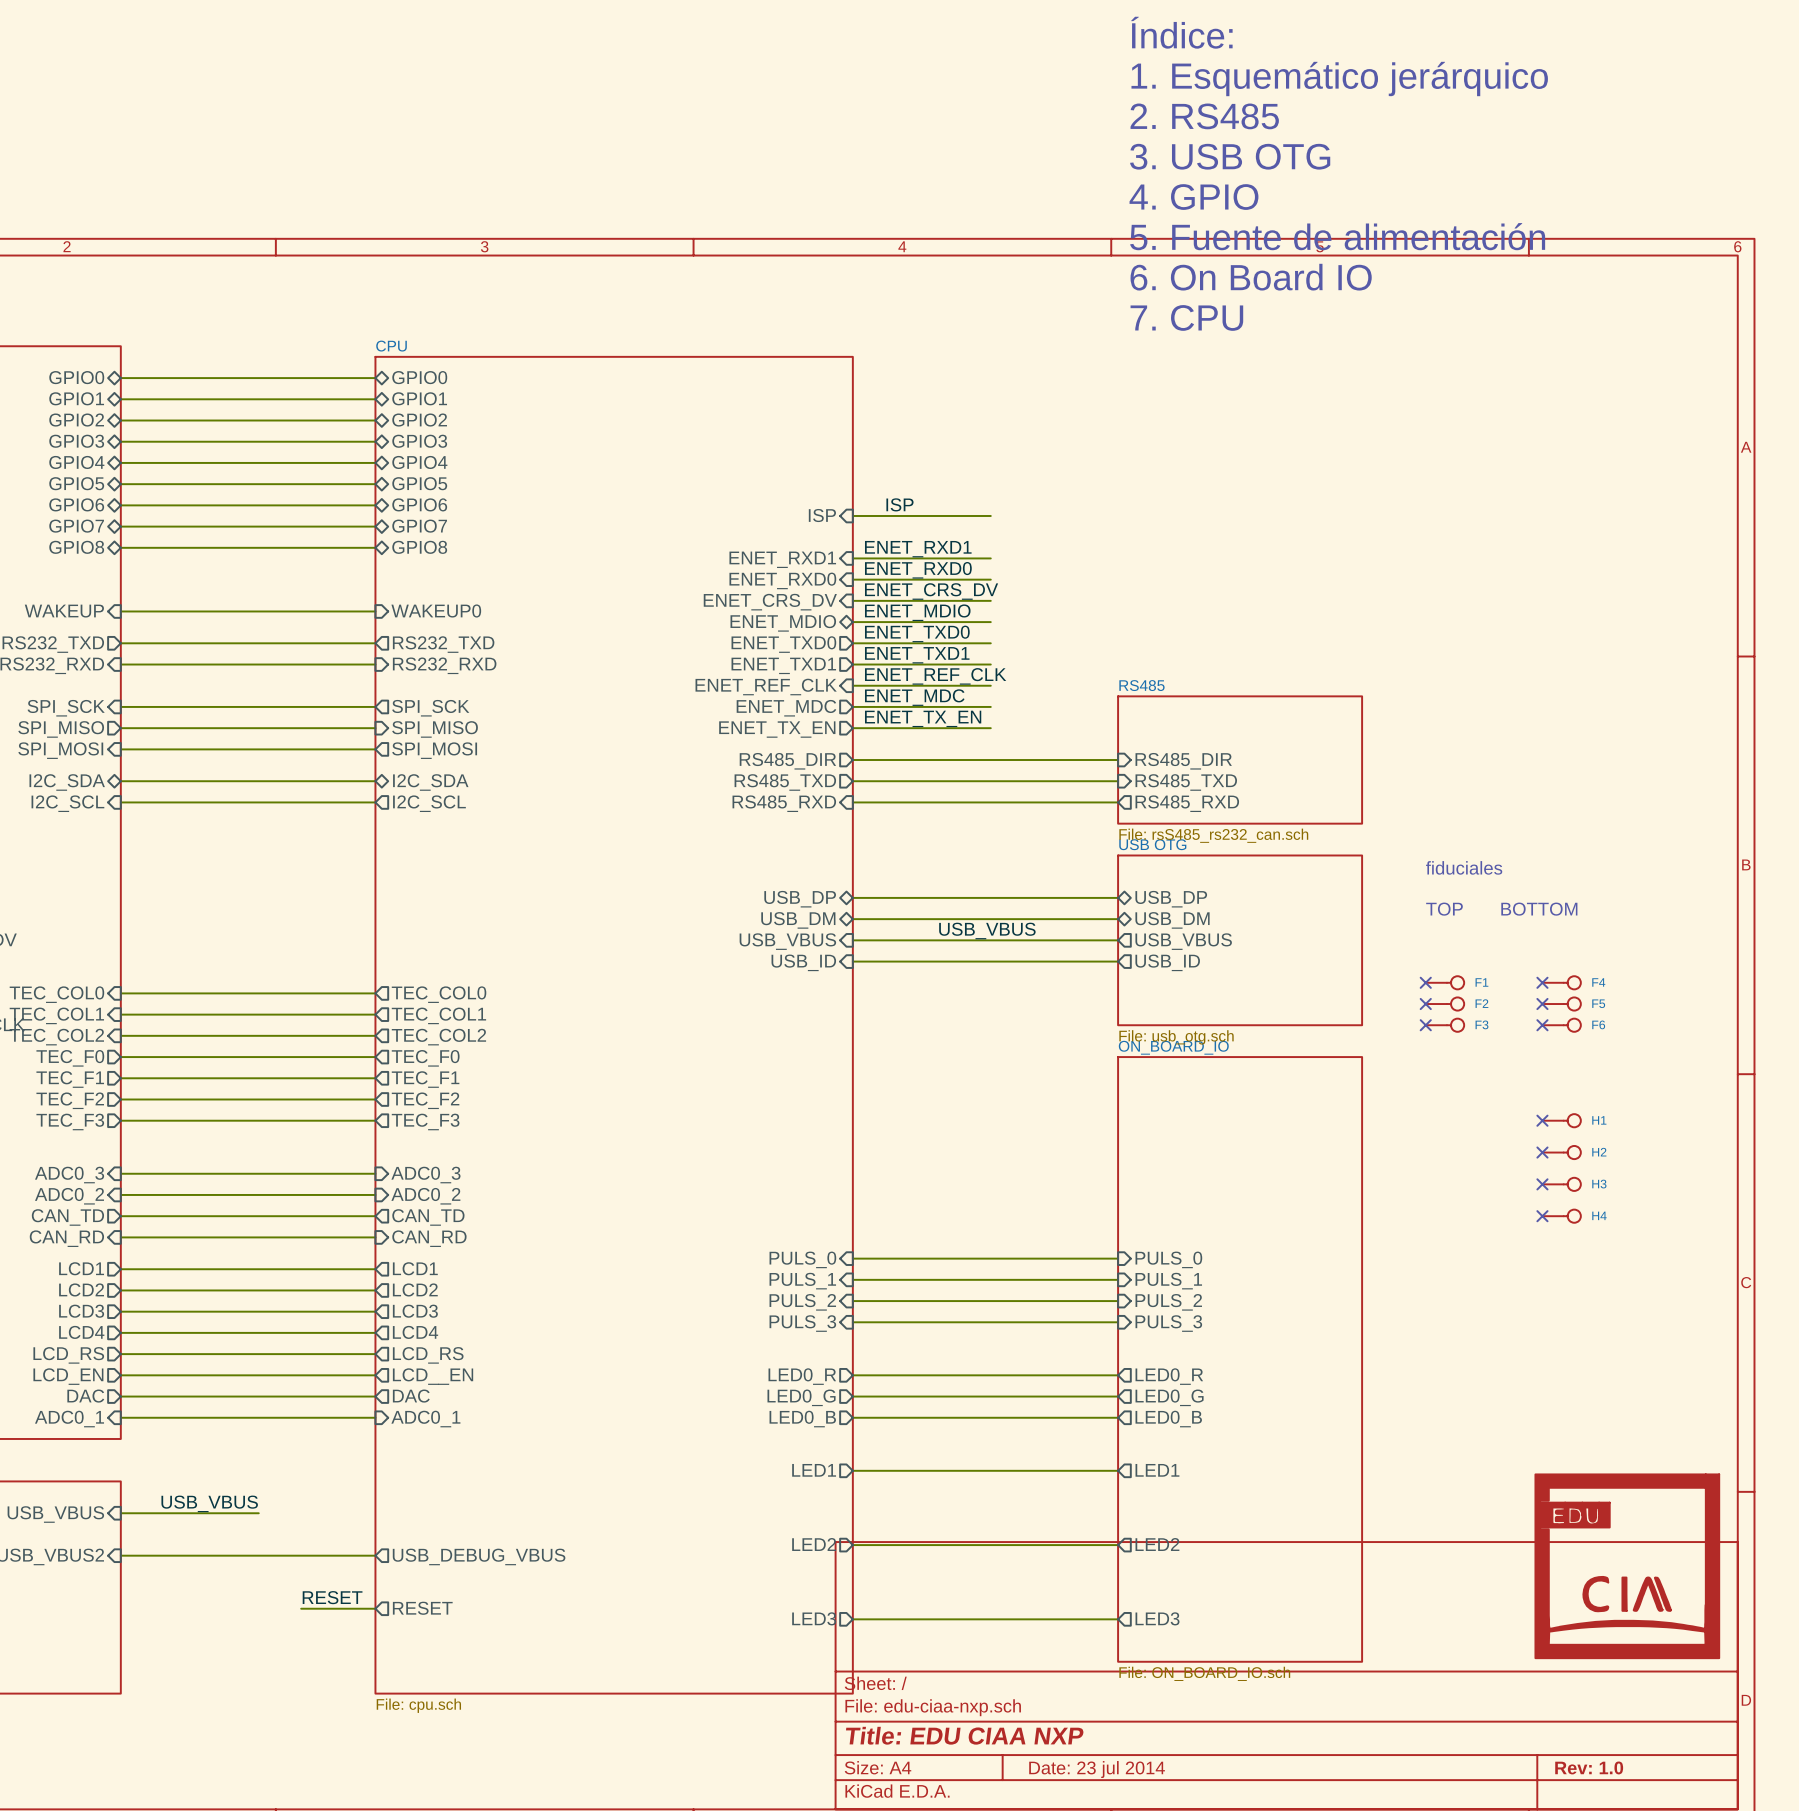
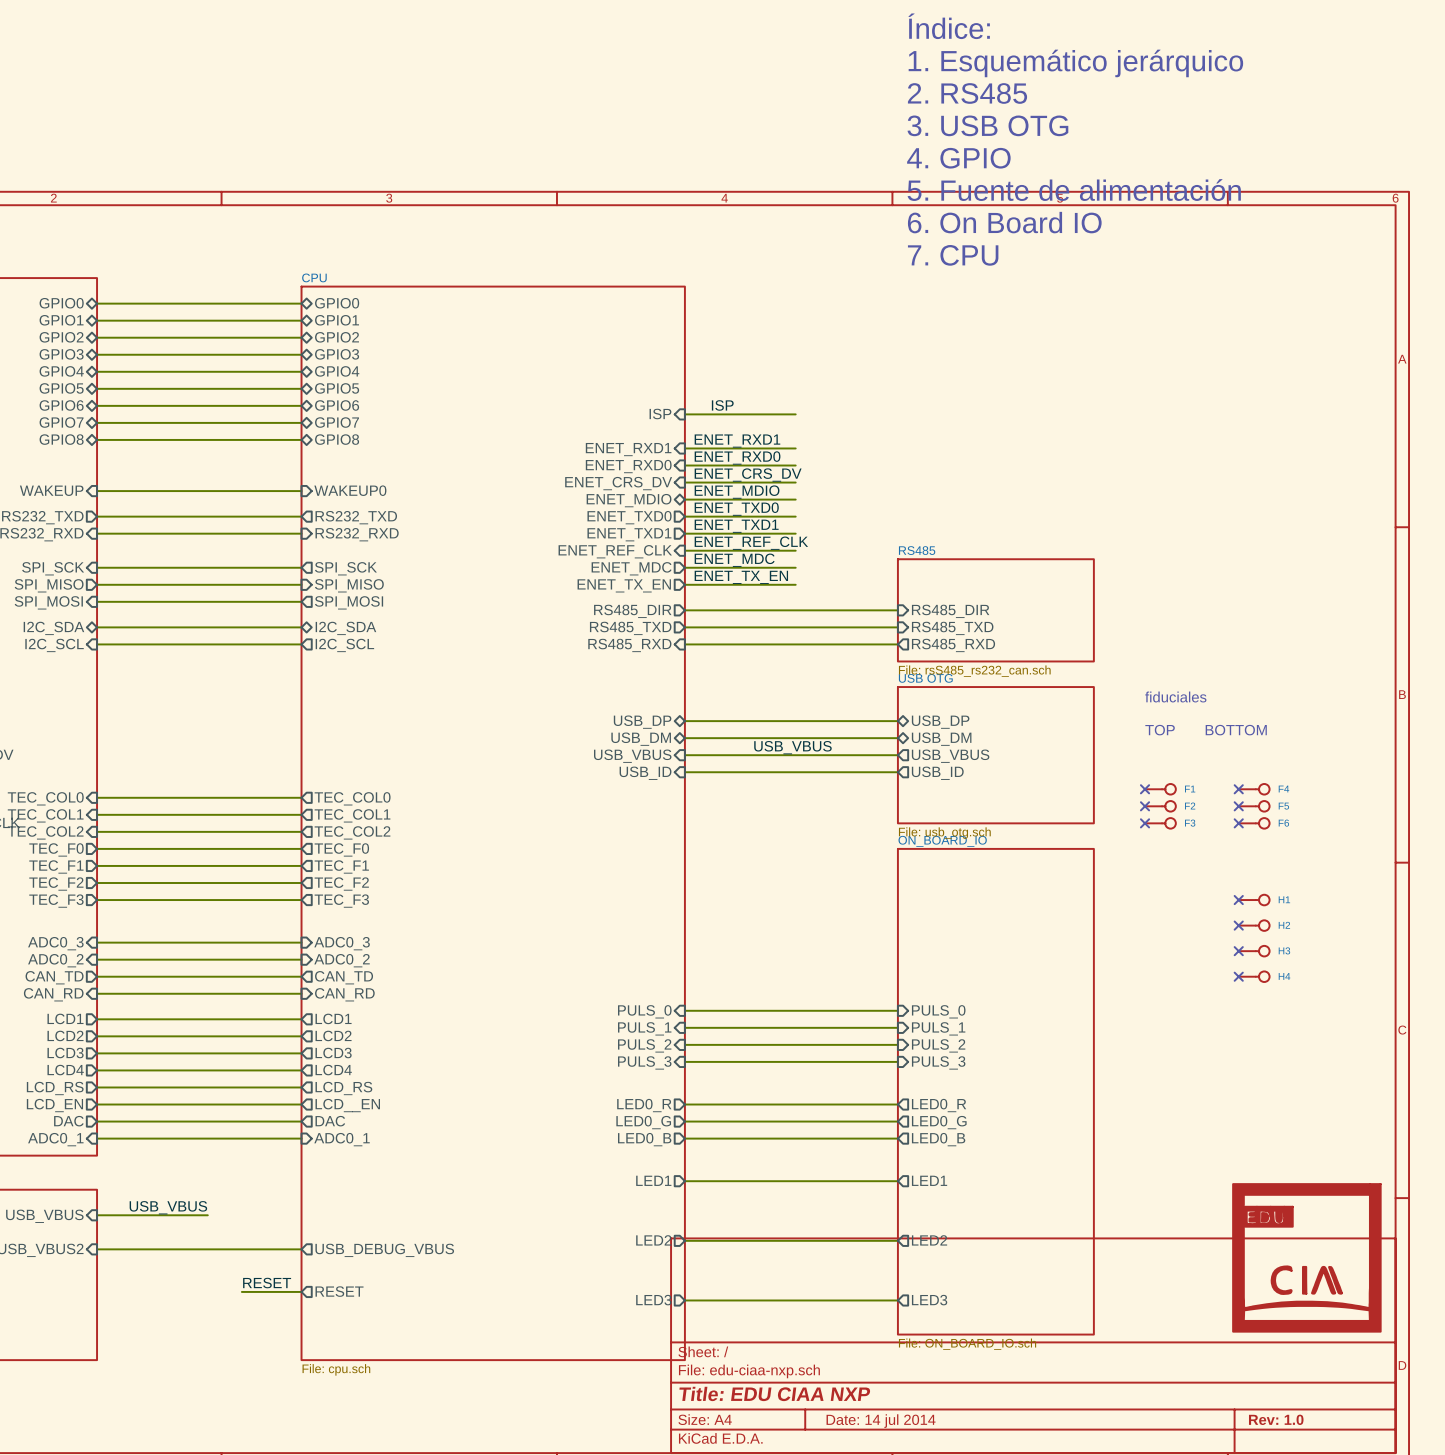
title block: Date: 23 jul 2014 (1097, 1769) -> Date: 14 jul 2014 (881, 1421)

